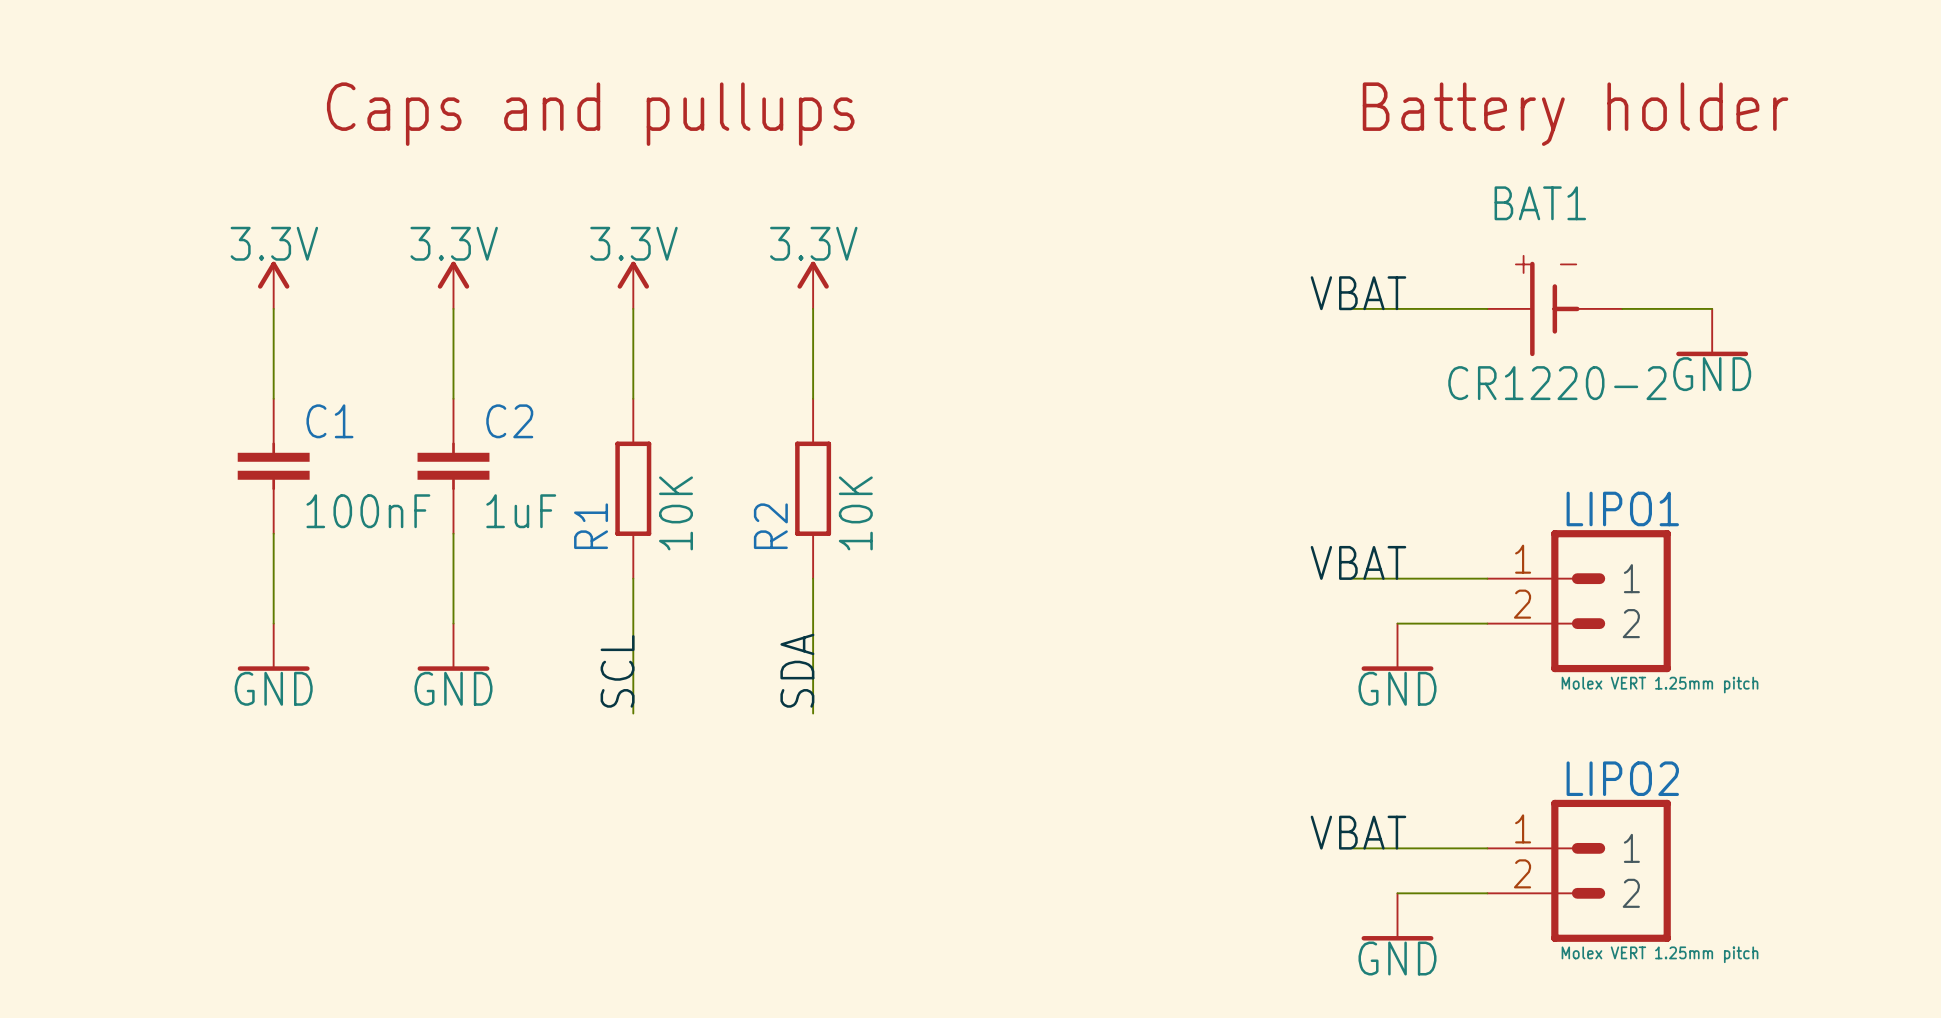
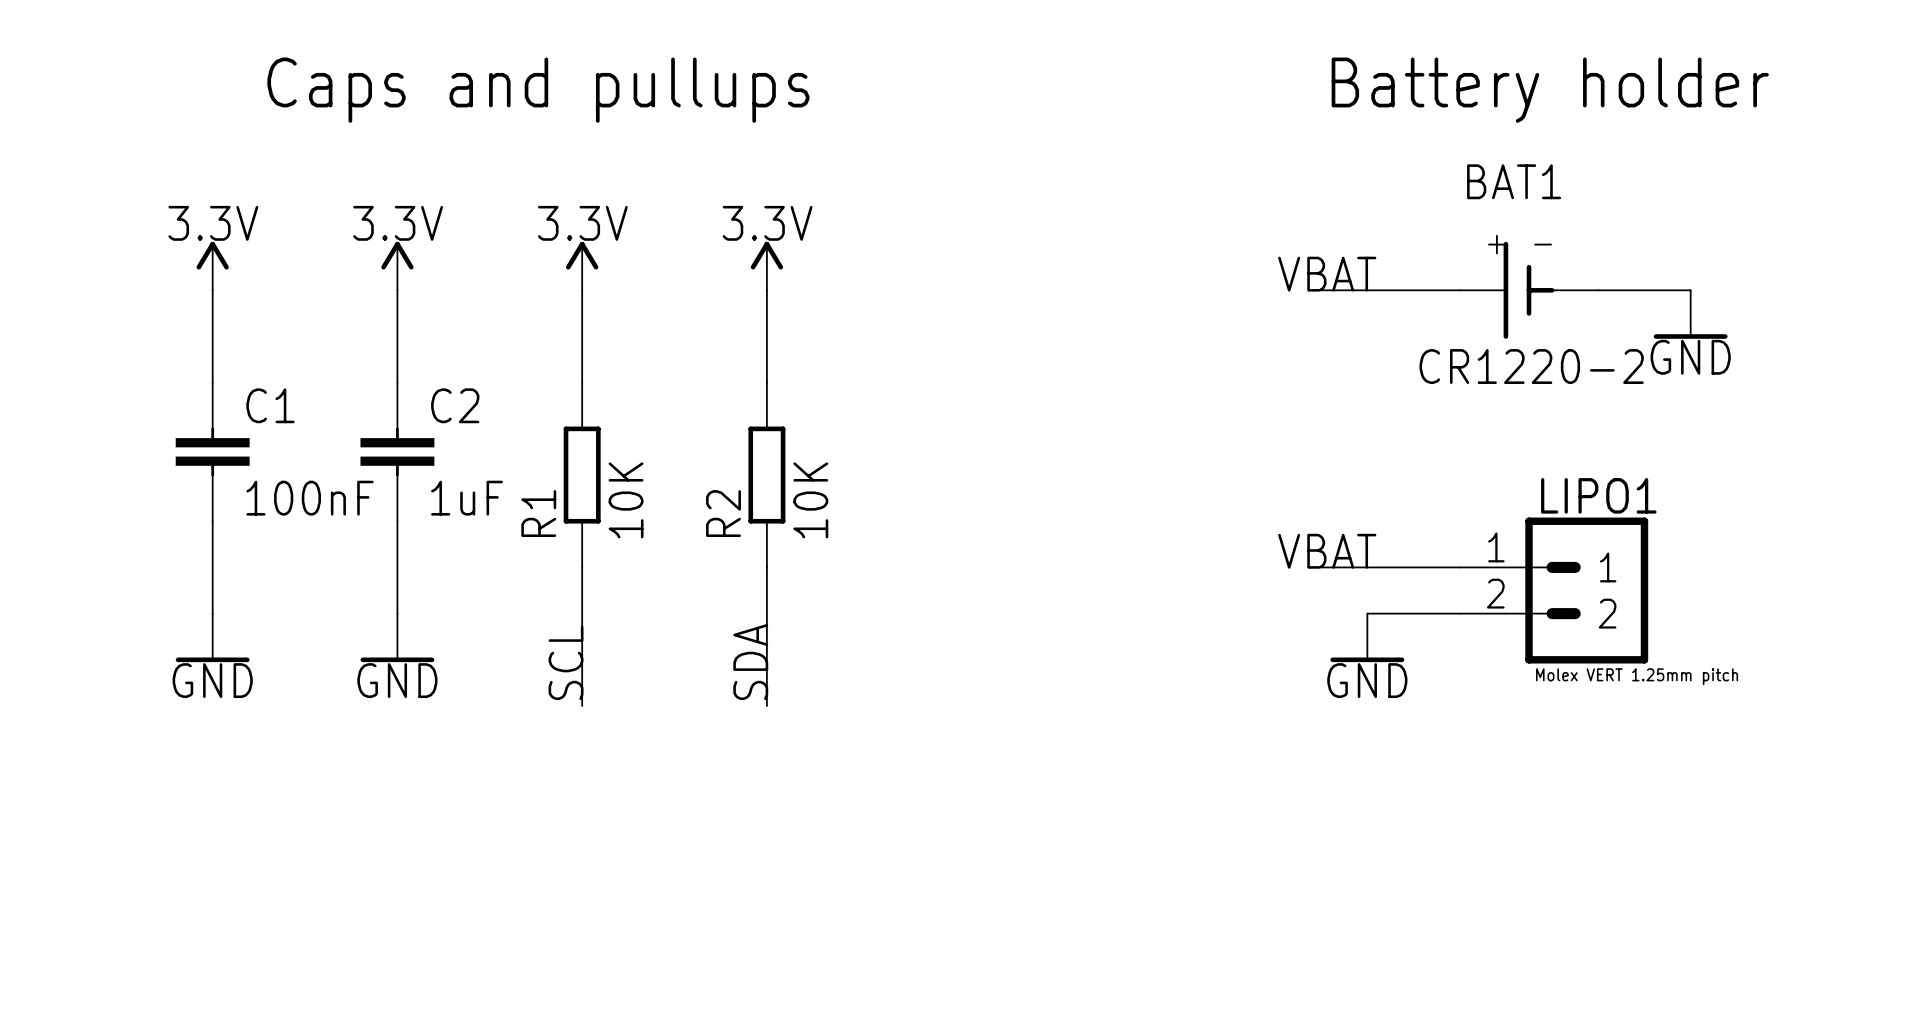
label: VBAT (1358, 832) -> none
wire: (1352, 848) (1487, 848) -> none
LIPO2: Molex VERT 1.25mm pitch (1579, 870) -> none
wire: (1397, 893) (1487, 893) -> none
power symbol: GND (1397, 916) -> none

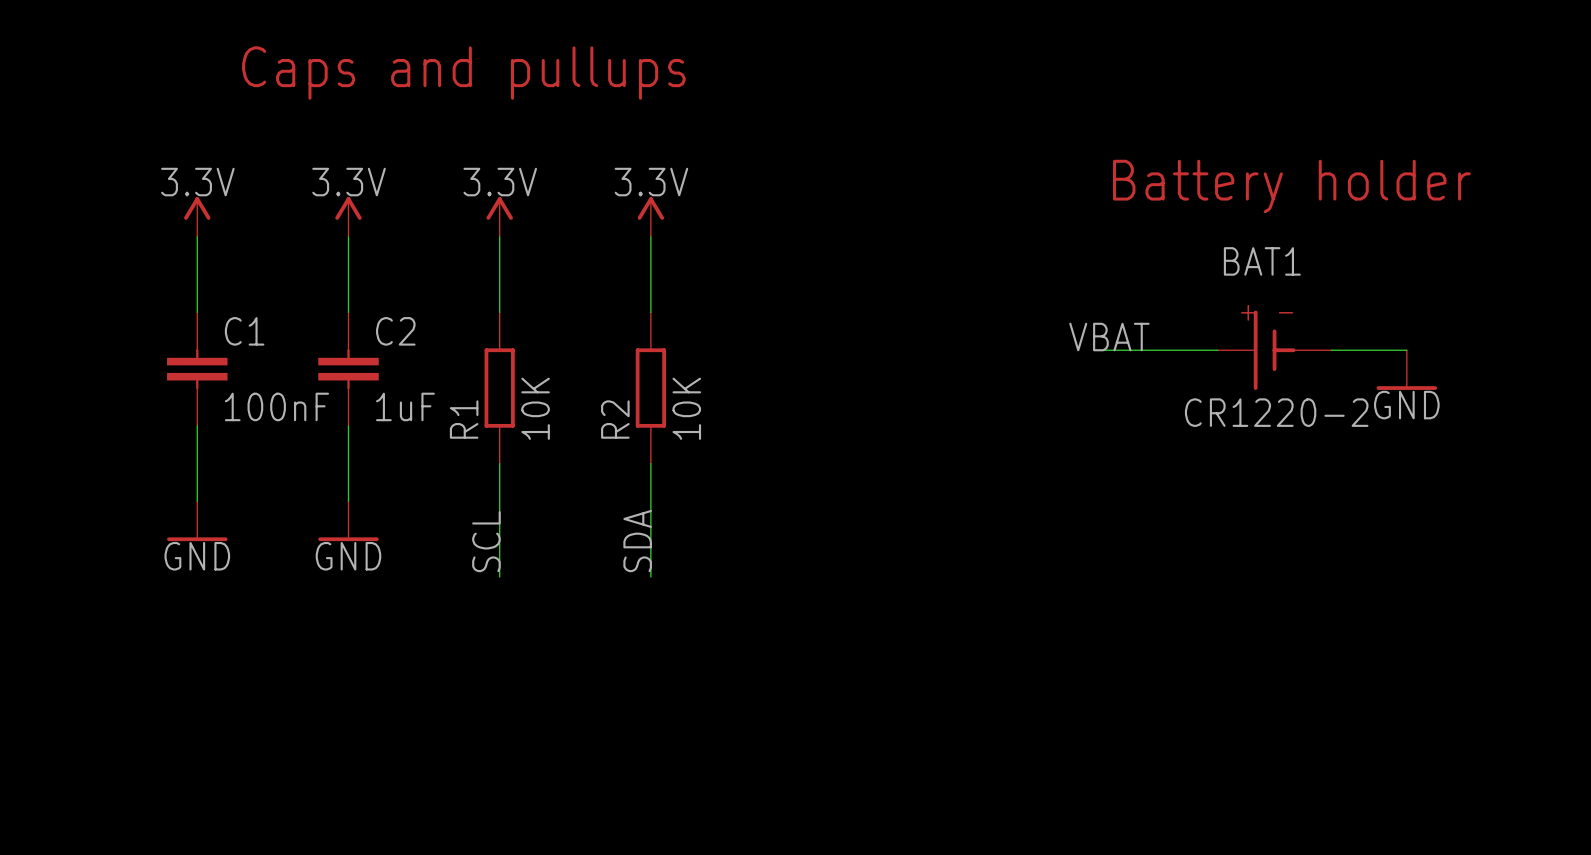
text position: Battery holder (1550, 90) -> Battery holder (1291, 186)
label: VBAT (1327, 274) -> none
wire: (1321, 290) (1459, 290) -> (1104, 350) (1217, 350)
BAT1 position: (1529, 290) -> (1274, 350)
wire: (1598, 290) (1690, 290) -> (1331, 350) (1406, 350)
power symbol position: GND (1690, 314) -> GND (1406, 370)
label: none -> VBAT (1109, 337)
label: VBAT (1327, 551) -> none
wire: (1321, 567) (1459, 567) -> none
LIPO1: Molex VERT 1.25mm pitch (1553, 590) -> none
wire: (1367, 613) (1459, 613) -> none
power symbol: GND (1367, 637) -> none

